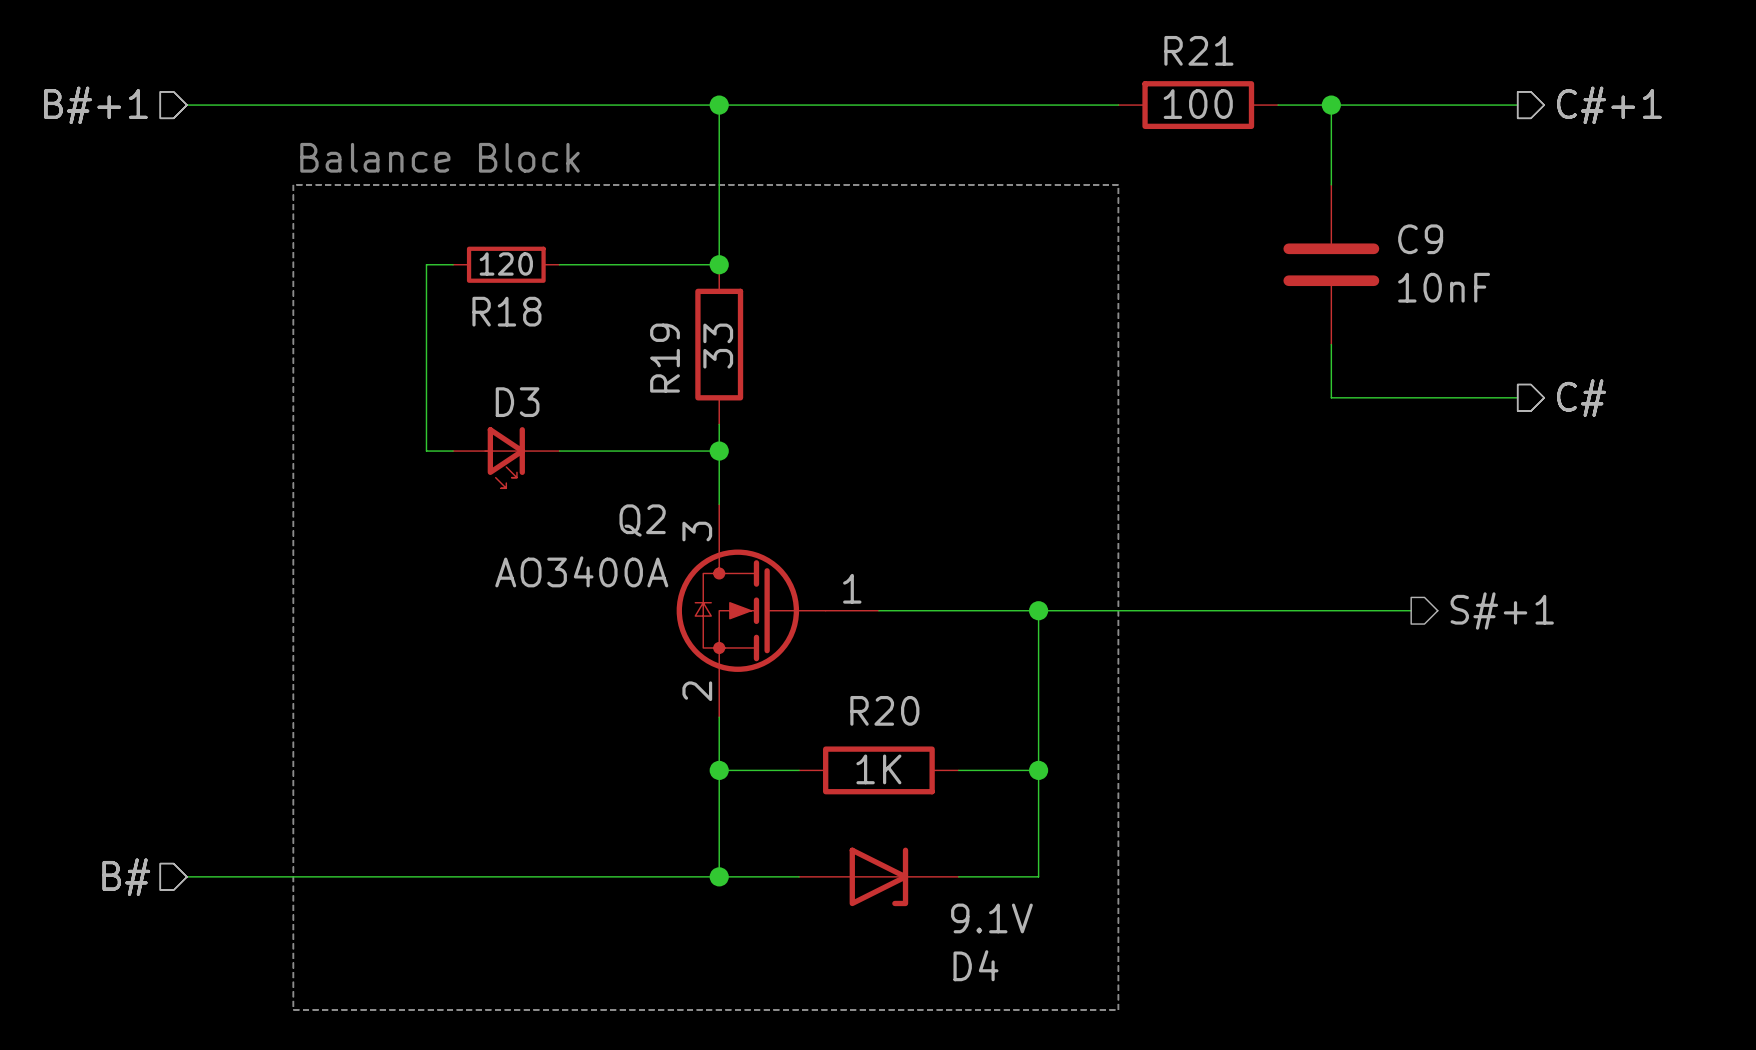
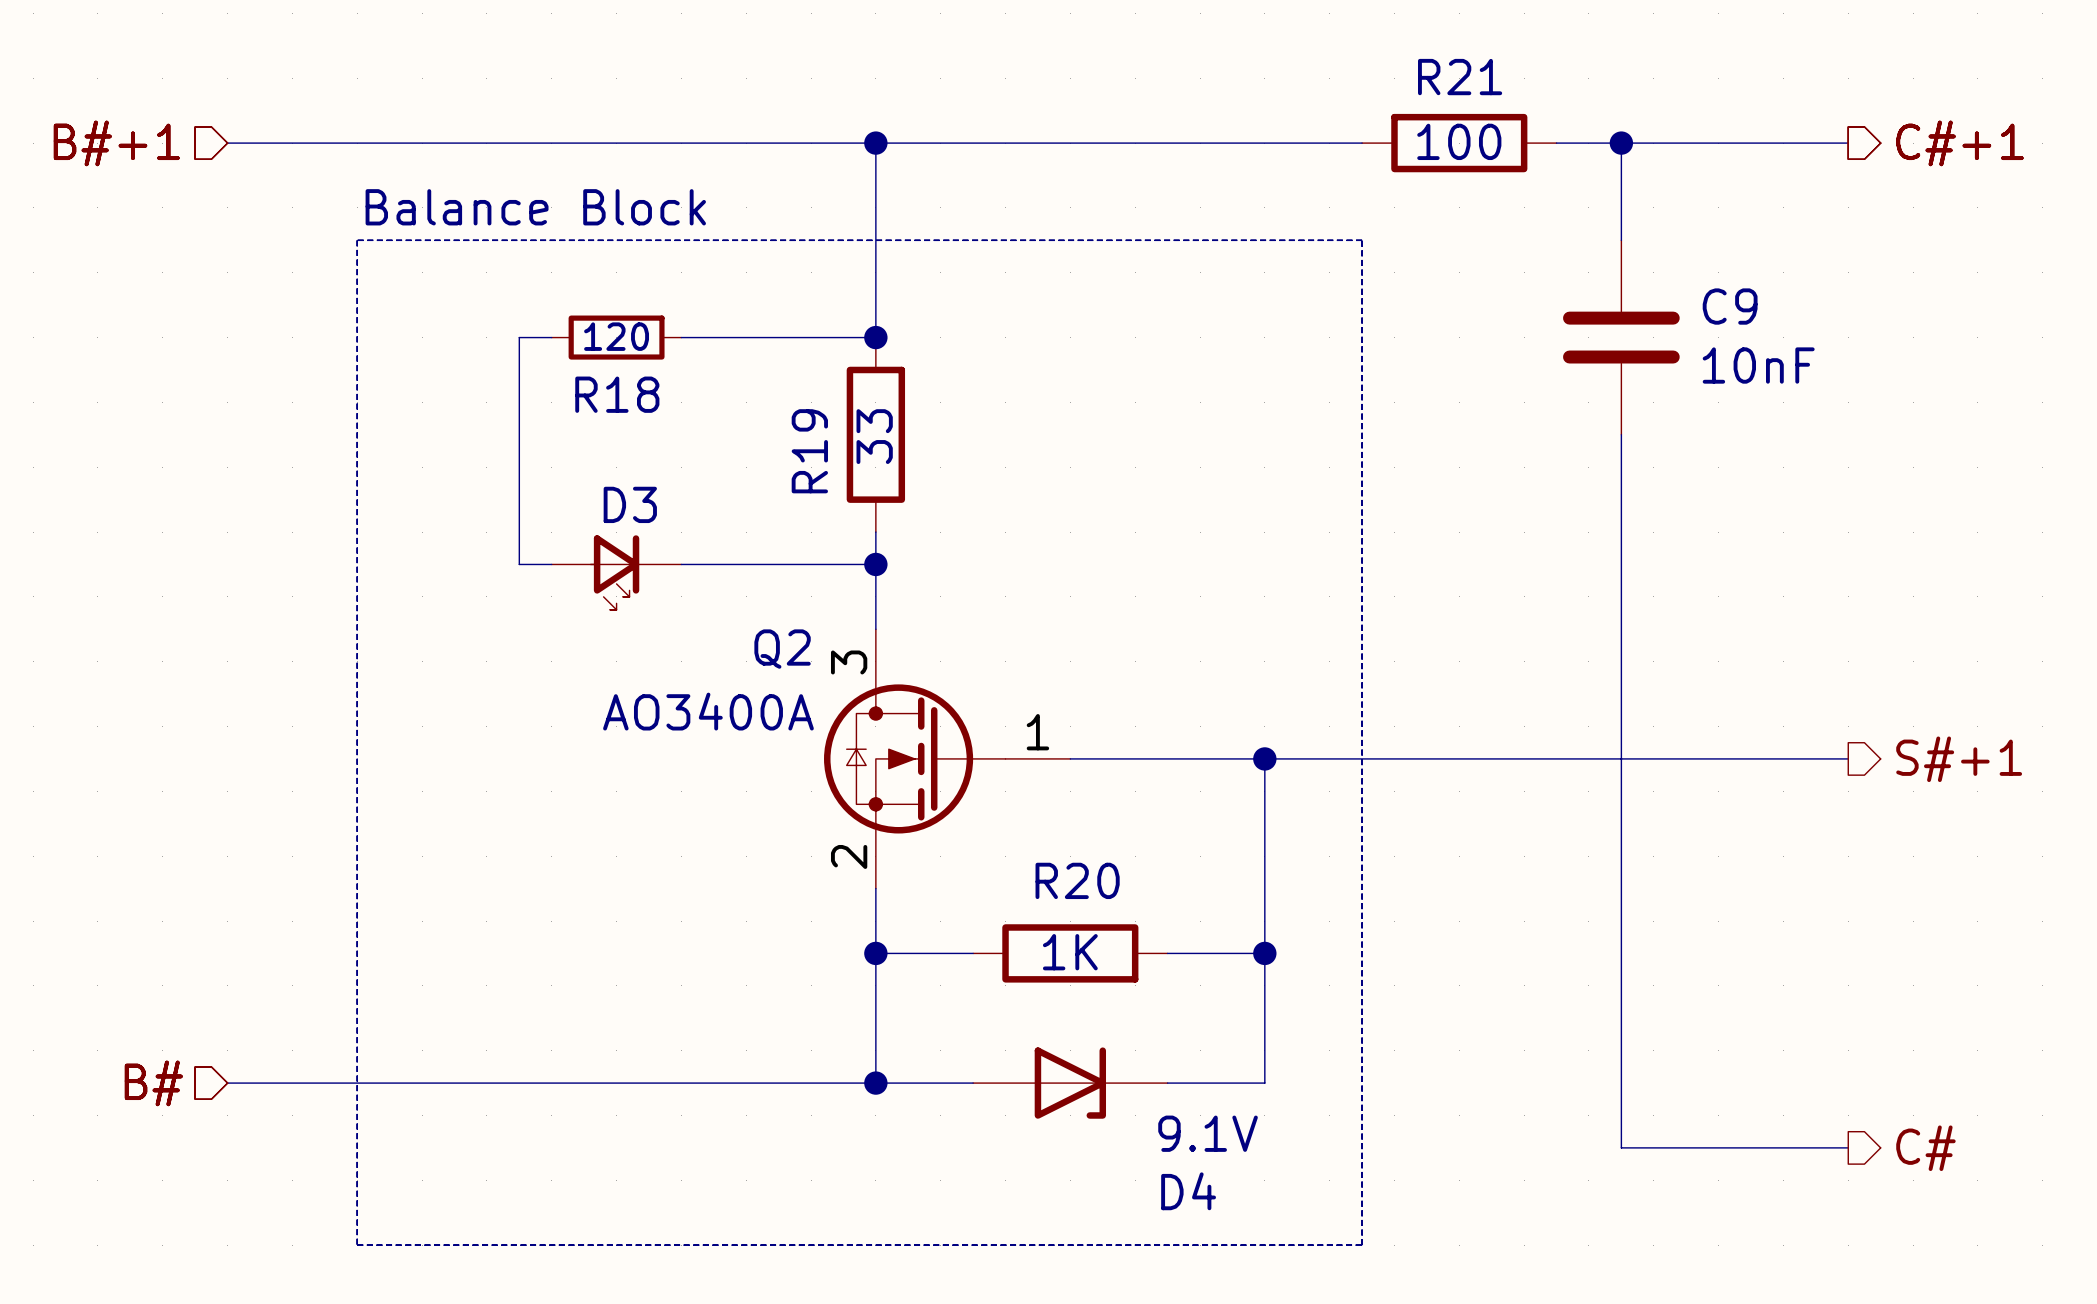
wire: (1331, 397) (1517, 397) -> (1621, 499) (1621, 1147) (1848, 1147)
hierarchical label: C# (1581, 398) -> none
wire: none -> (1718, 758) (1848, 758)
hierarchical label position: S#+1 (1502, 611) -> S#+1 (1959, 759)
hierarchical label: none -> C# (1925, 1148)

